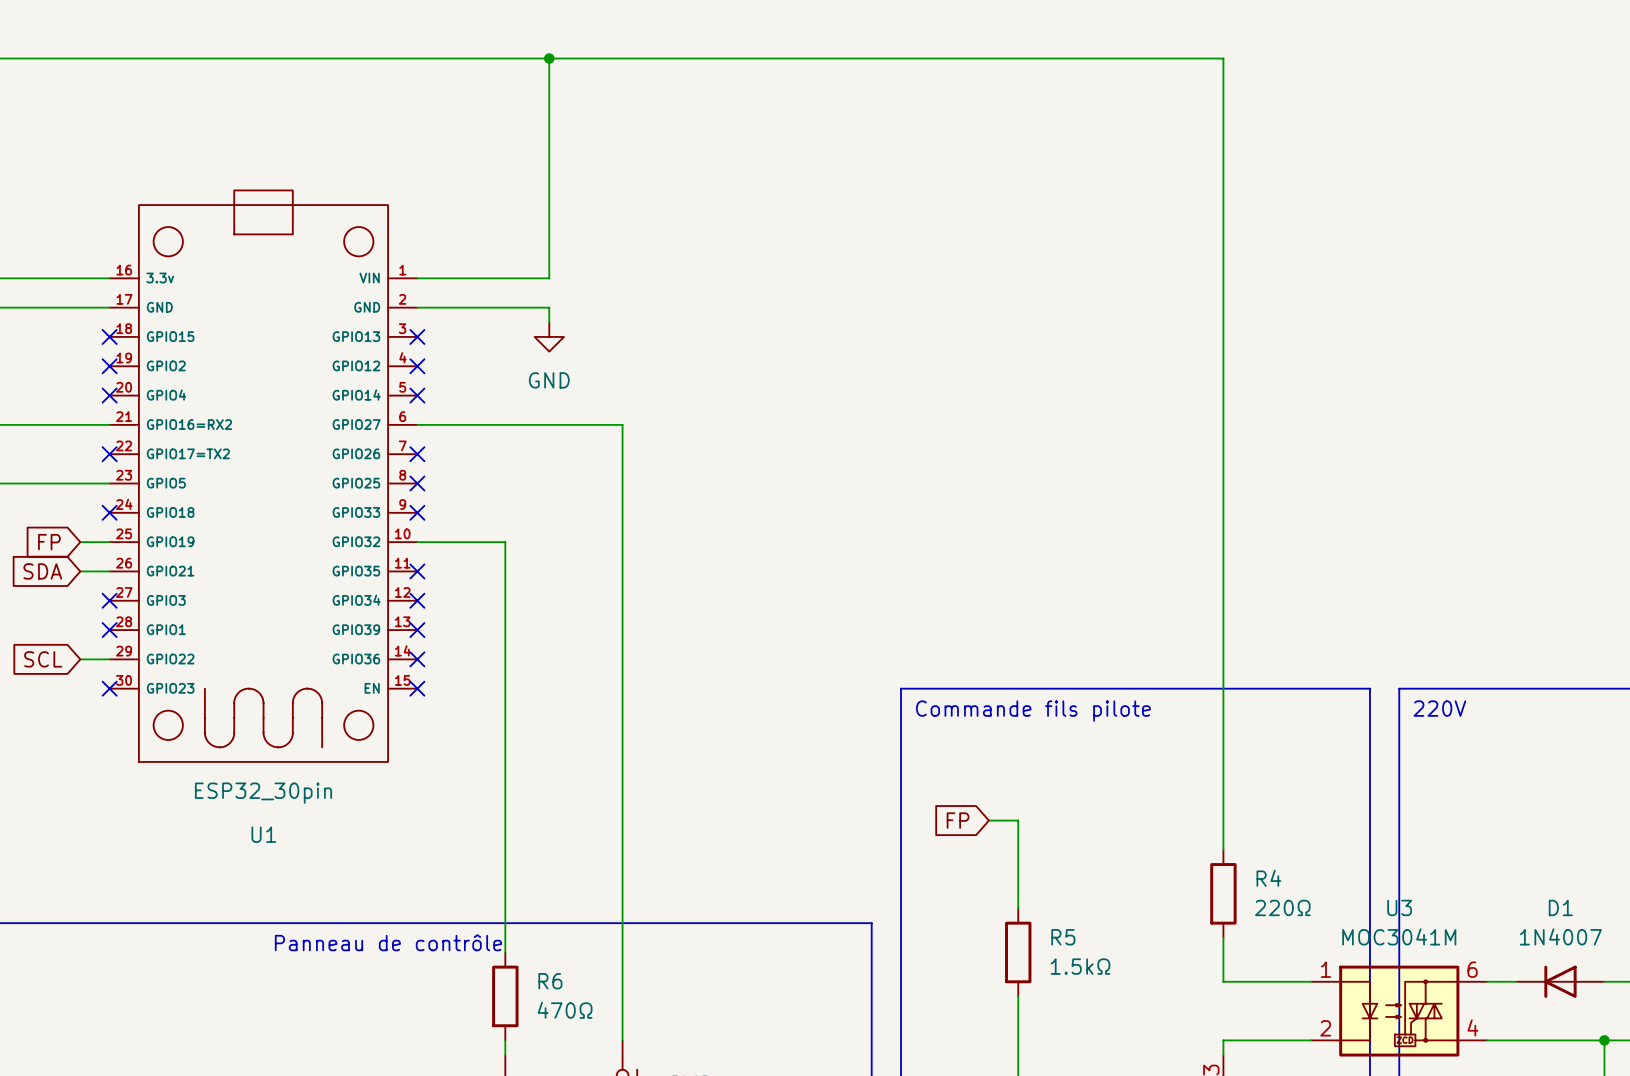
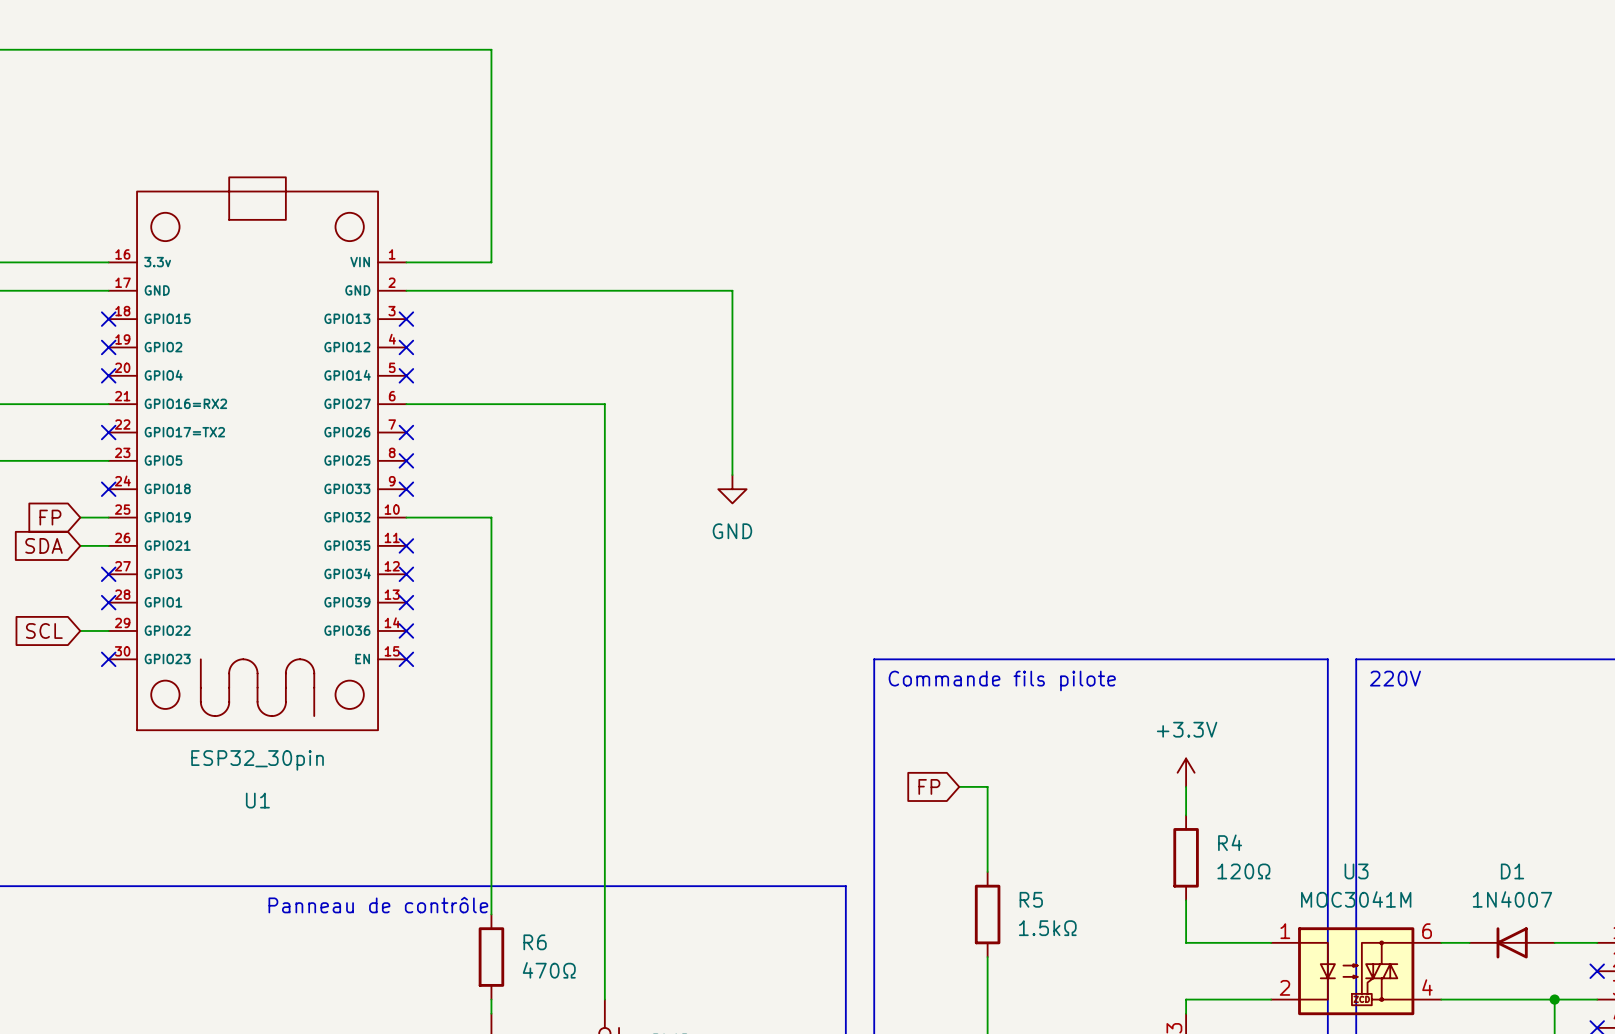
wire: (505, 58) (1223, 58) (1223, 820) -> none
wire: (549, 58) (549, 278) (505, 278) -> (491, 49) (491, 262)
junction: (549, 58) -> none
wire: (549, 307) (549, 322) -> (533, 290) (732, 290) (732, 475)
power symbol position: GND (549, 336) -> GND (732, 489)
power symbol: none -> +3.3V (1186, 772)
R4 value: 220Ω (1282, 907) -> 120Ω (1243, 871)

